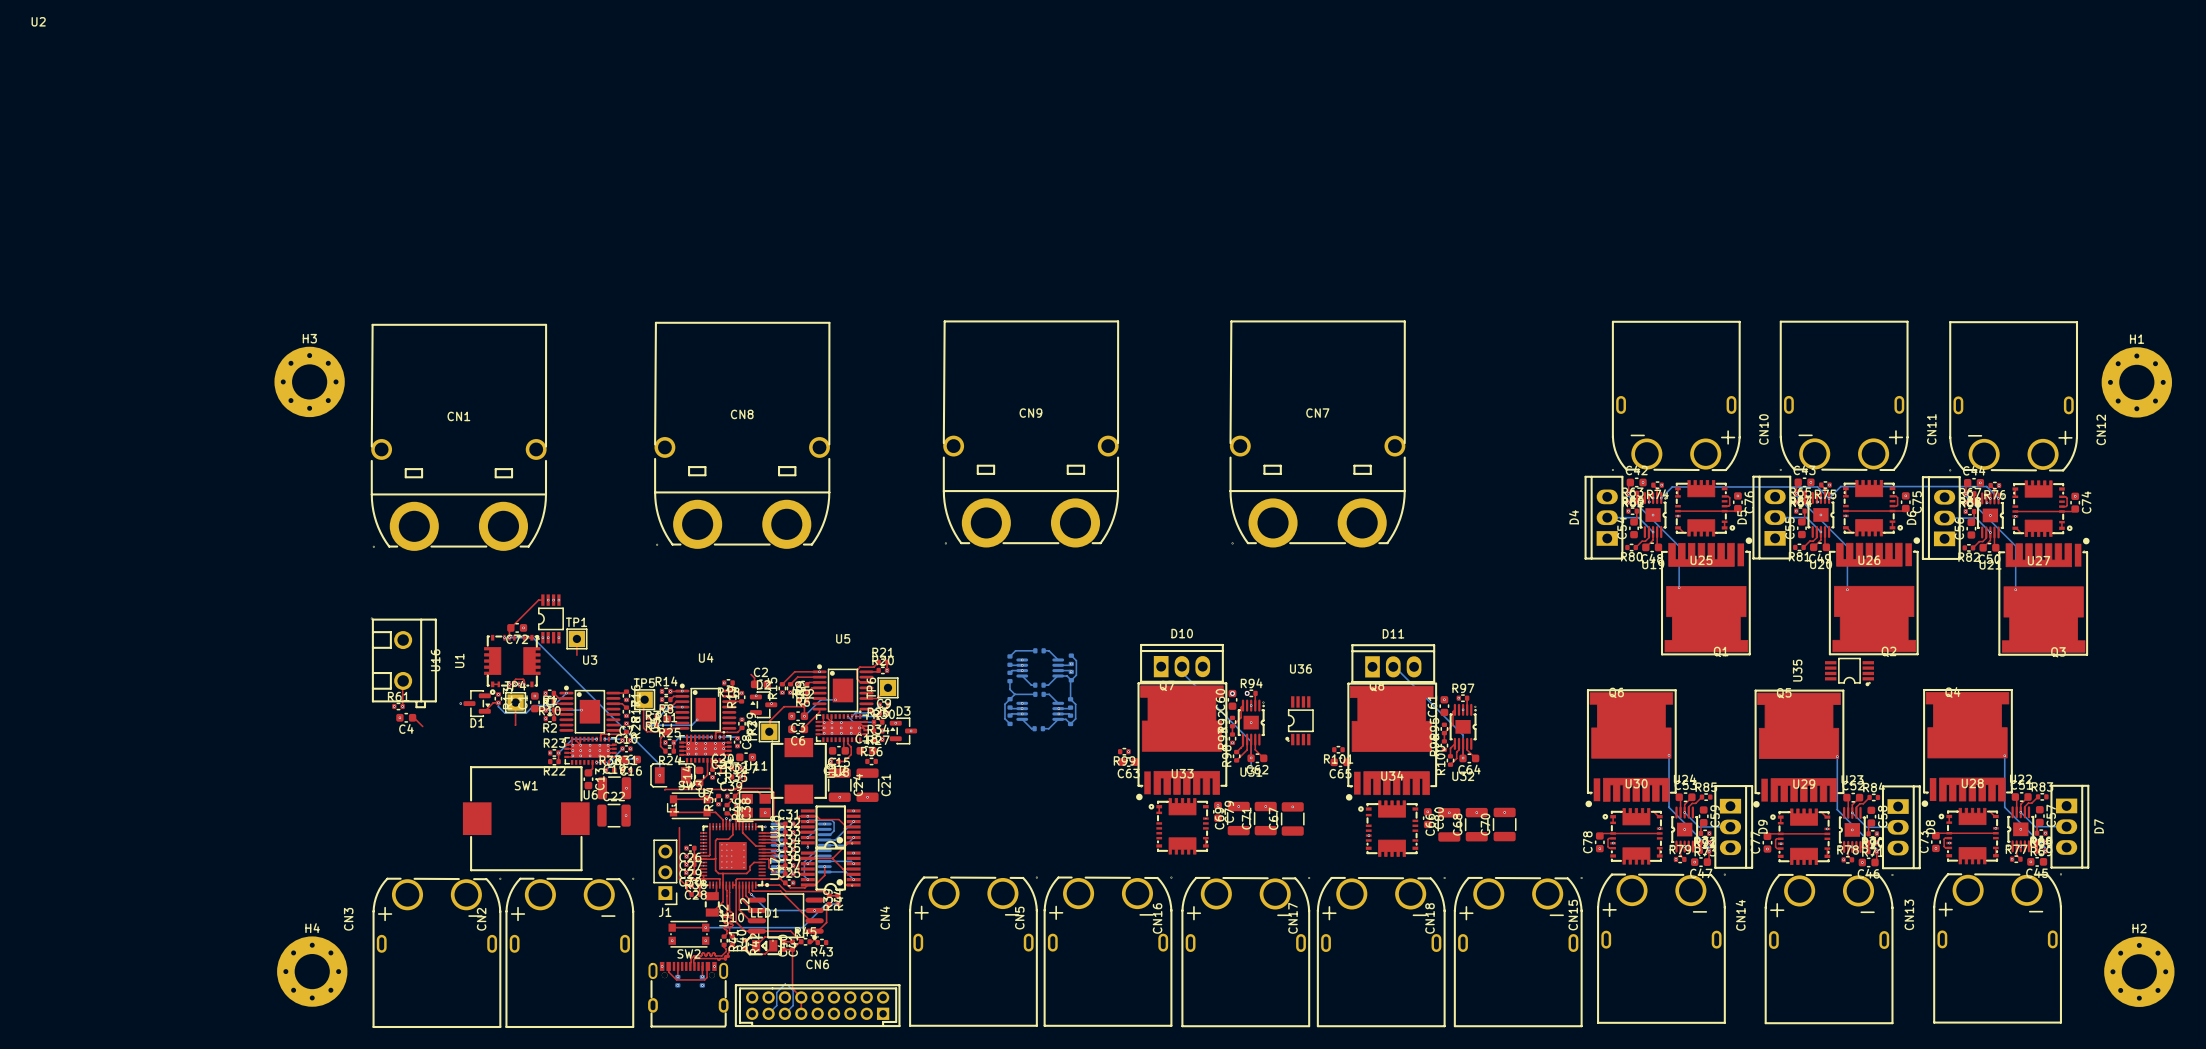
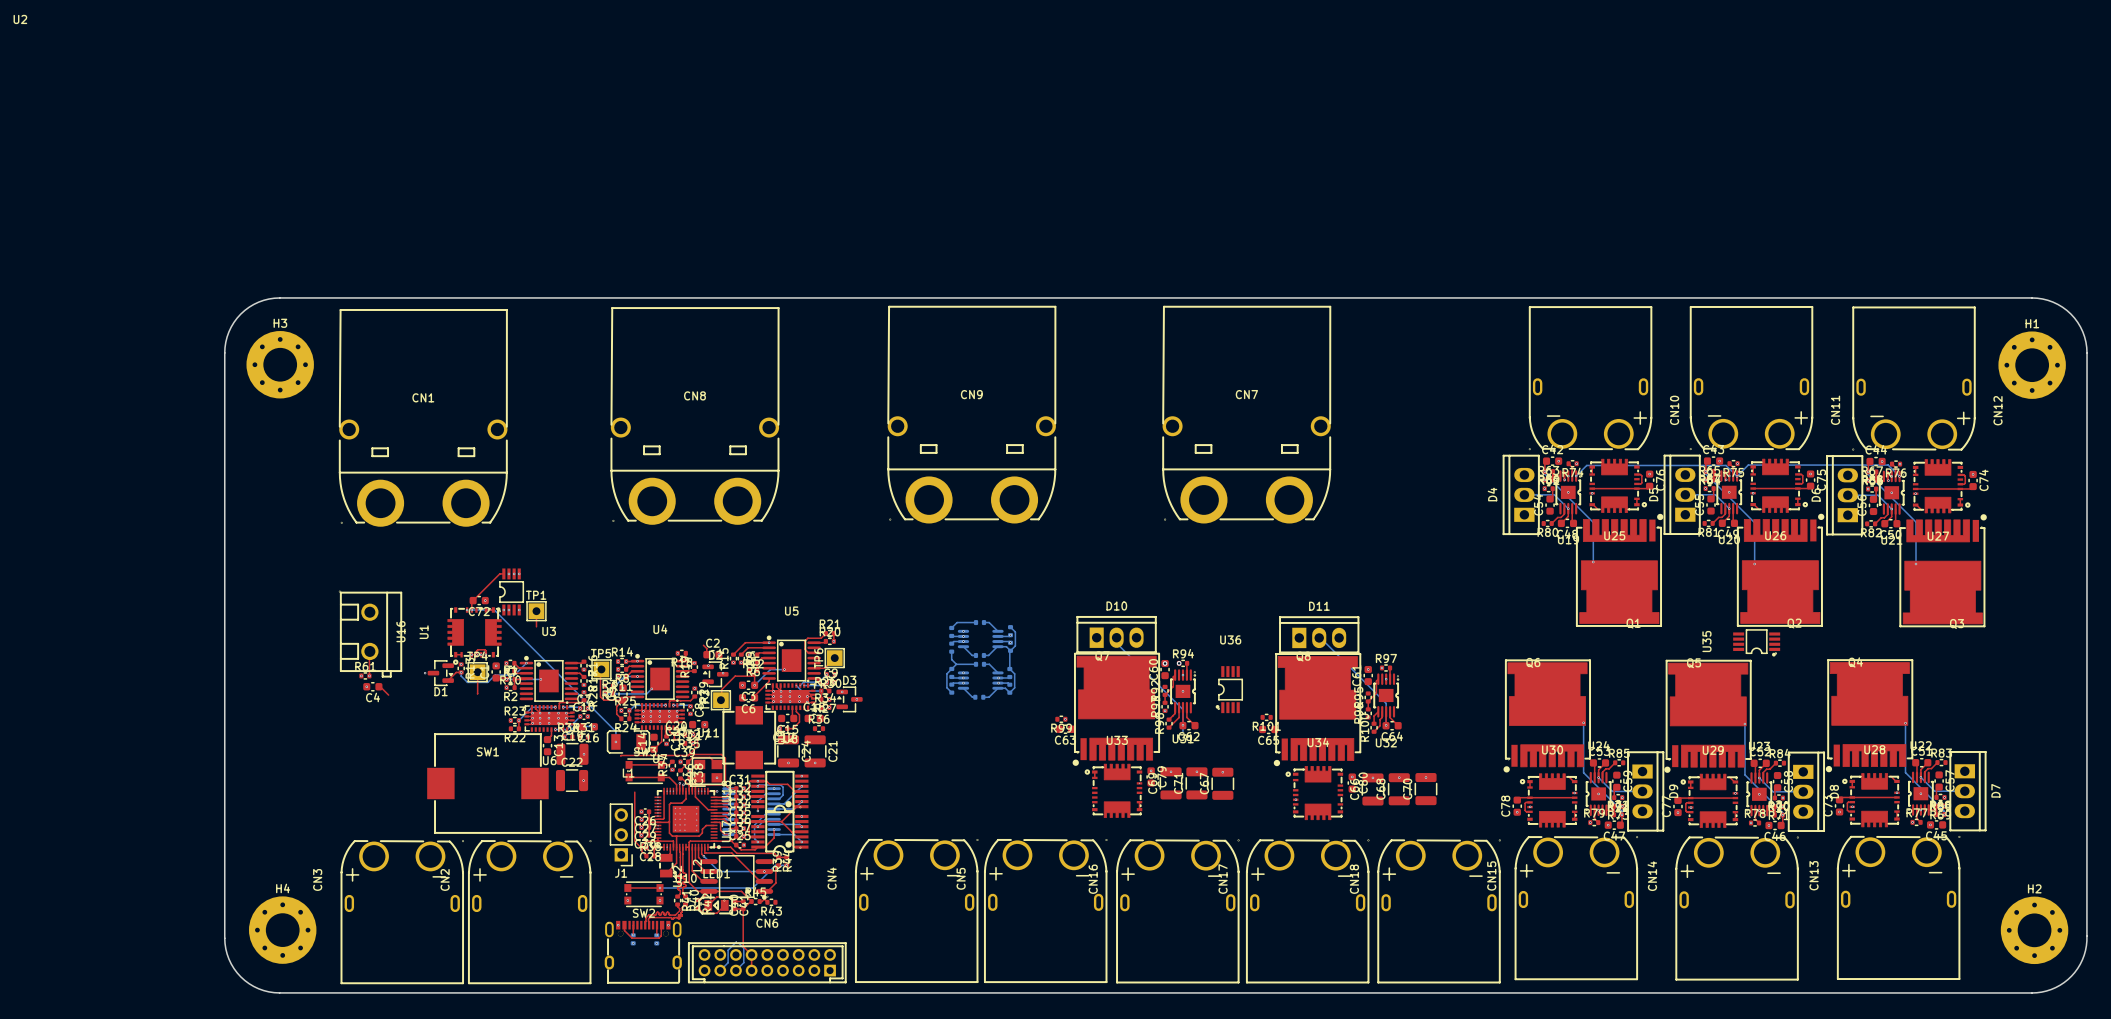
board edge: none -> (279, 297) (2031, 297) (2053, 302) (2066, 310) (2077, 322) (2084, 336) (2087, 352) (2086, 936) (2084, 955) (2074, 972) (2064, 982) (2051, 989) (2031, 992) (279, 992) (258, 988) (244, 980) (234, 968) (227, 954) (225, 943) (224, 352) (228, 331) (240, 314) (258, 302) (279, 297)

